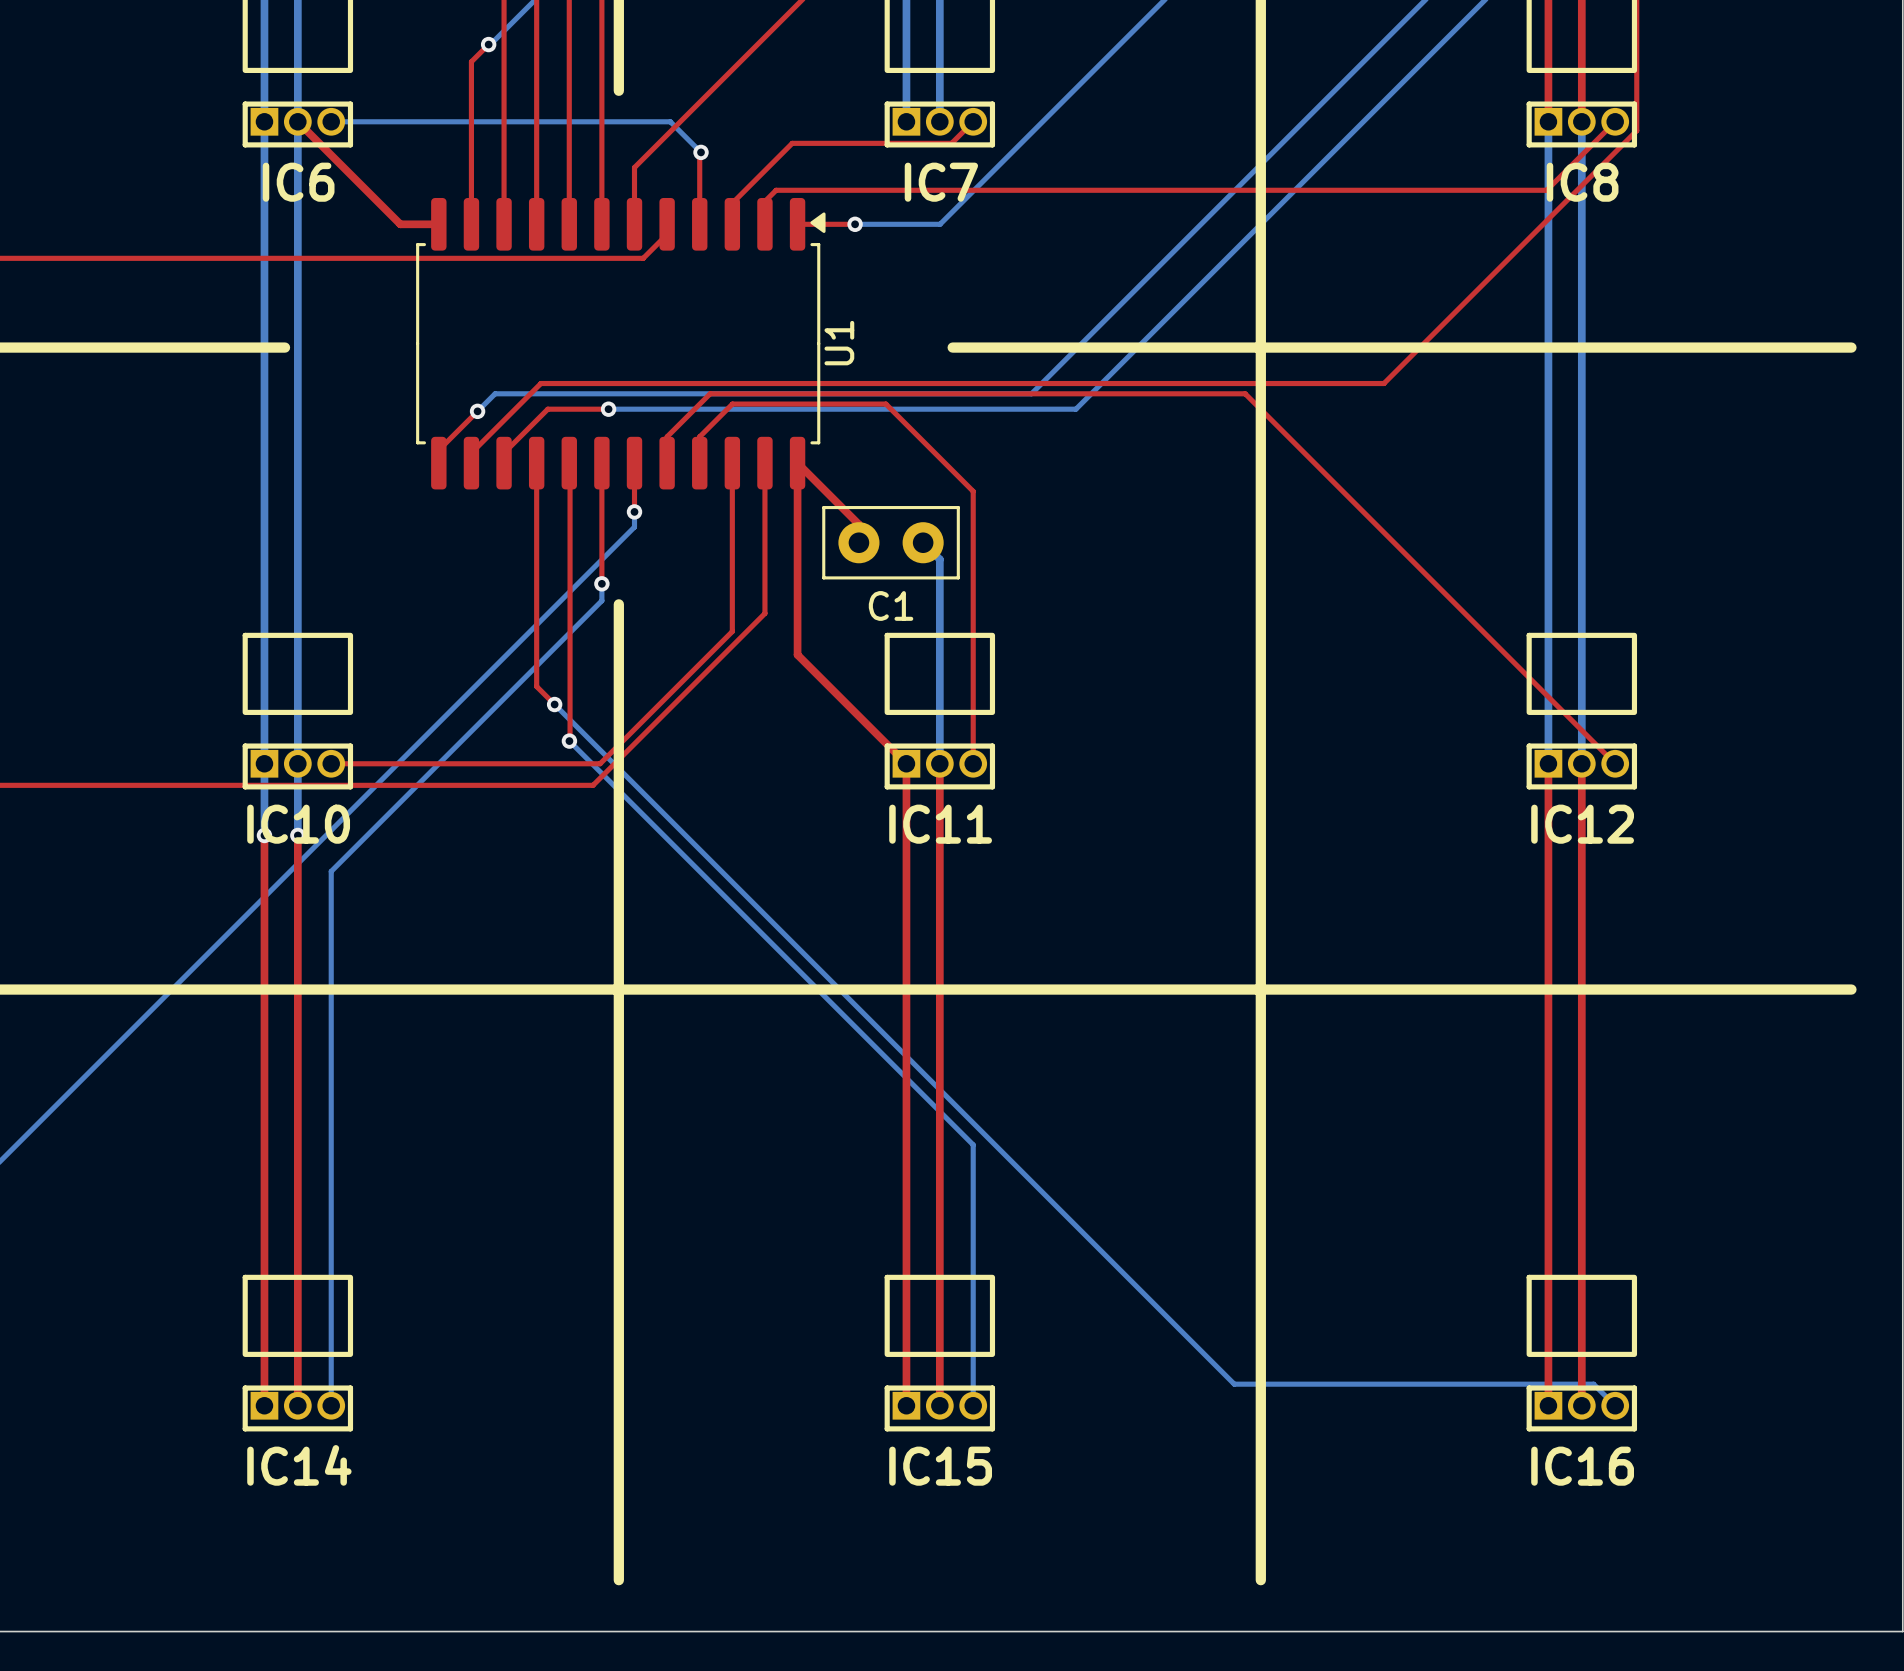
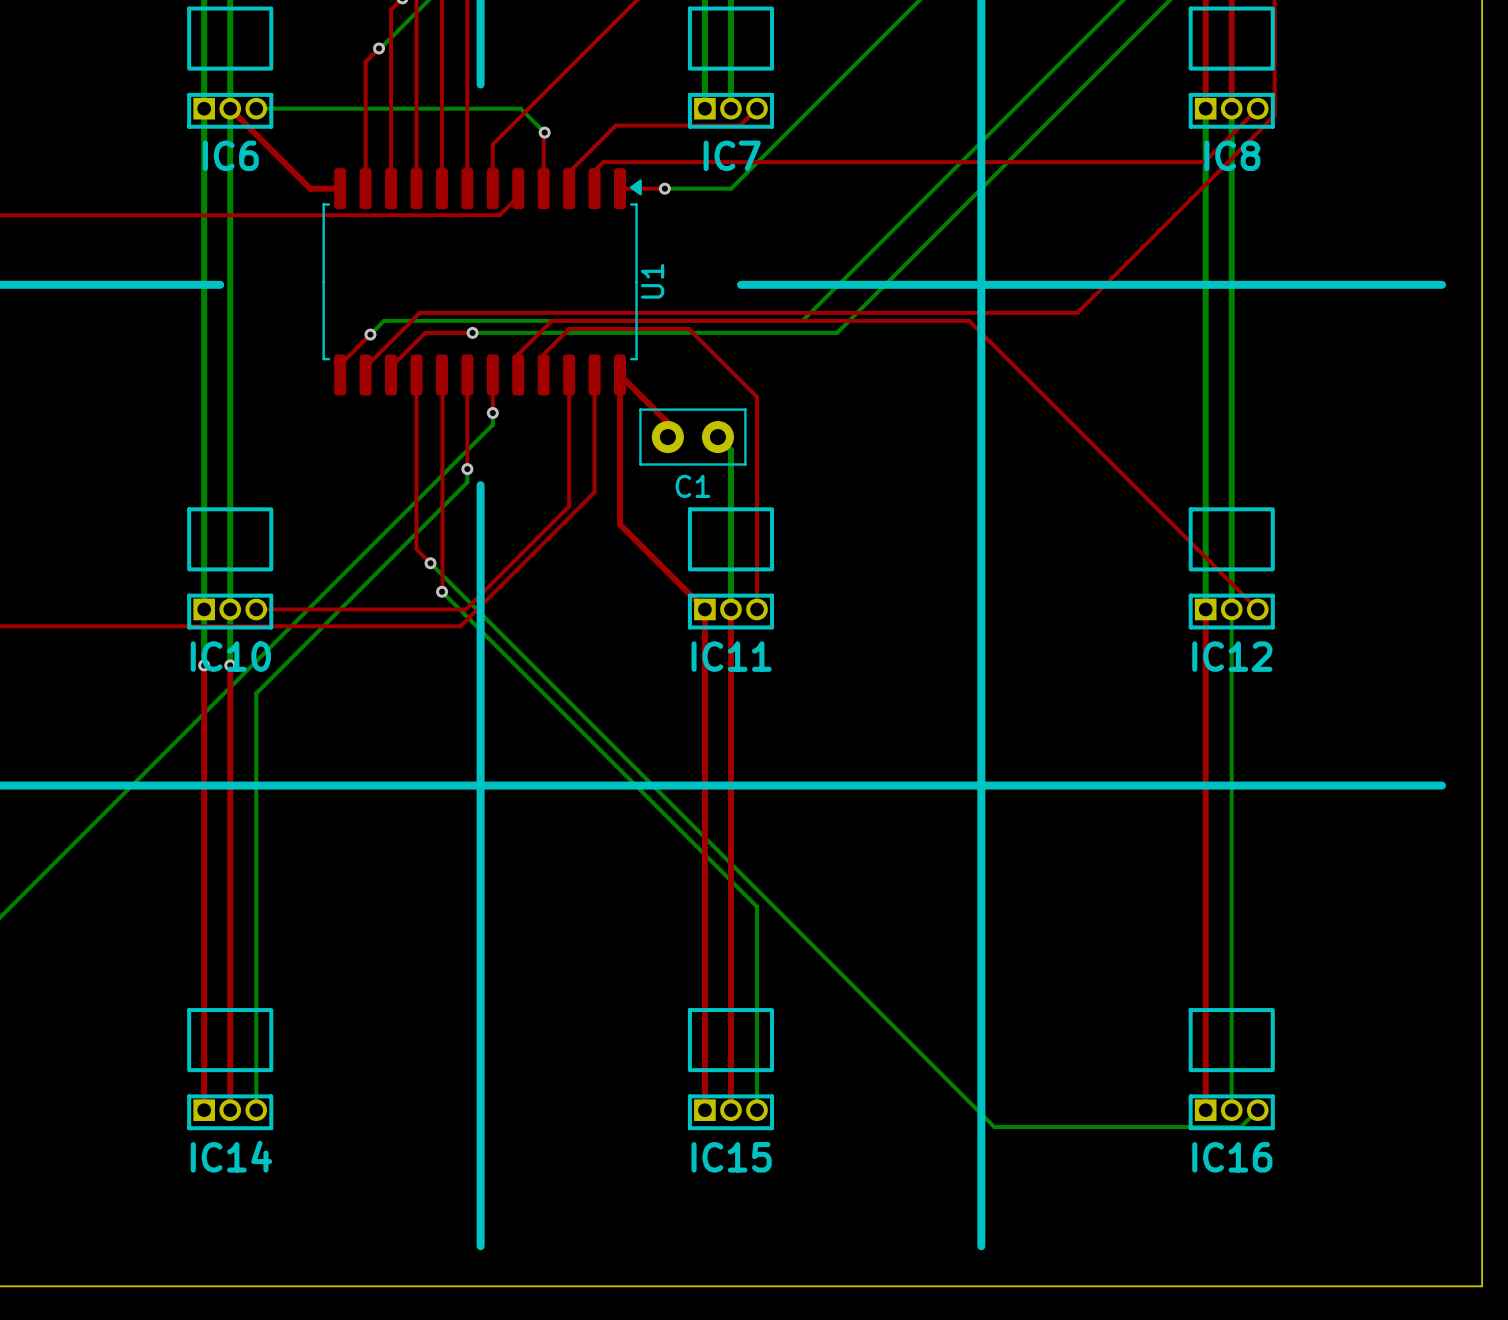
top track: (1581, 763) (1581, 1405) -> none
bottom track: none -> (1231, 609) (1231, 1110)
bottom track: (1234, 1384) (1593, 1384) (1615, 1405) -> (960, 1093) (994, 1127) (1240, 1127) (1257, 1110)

